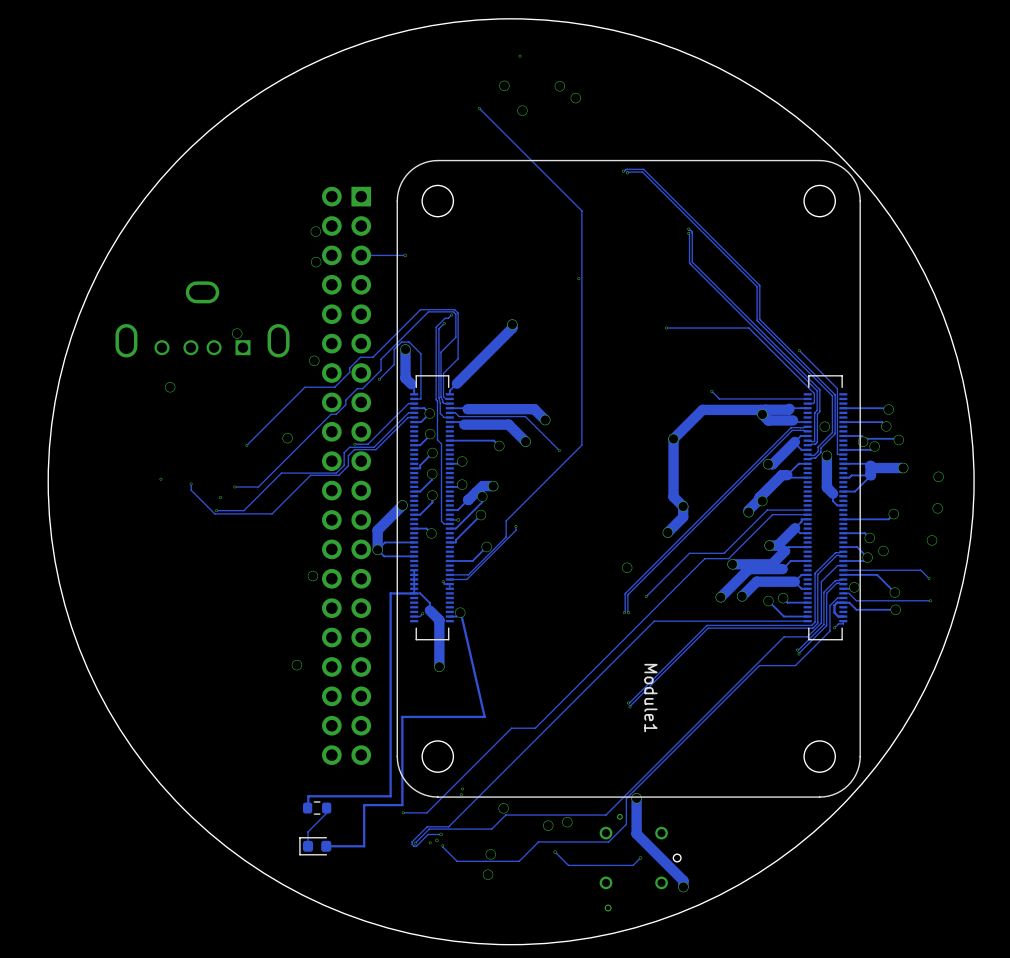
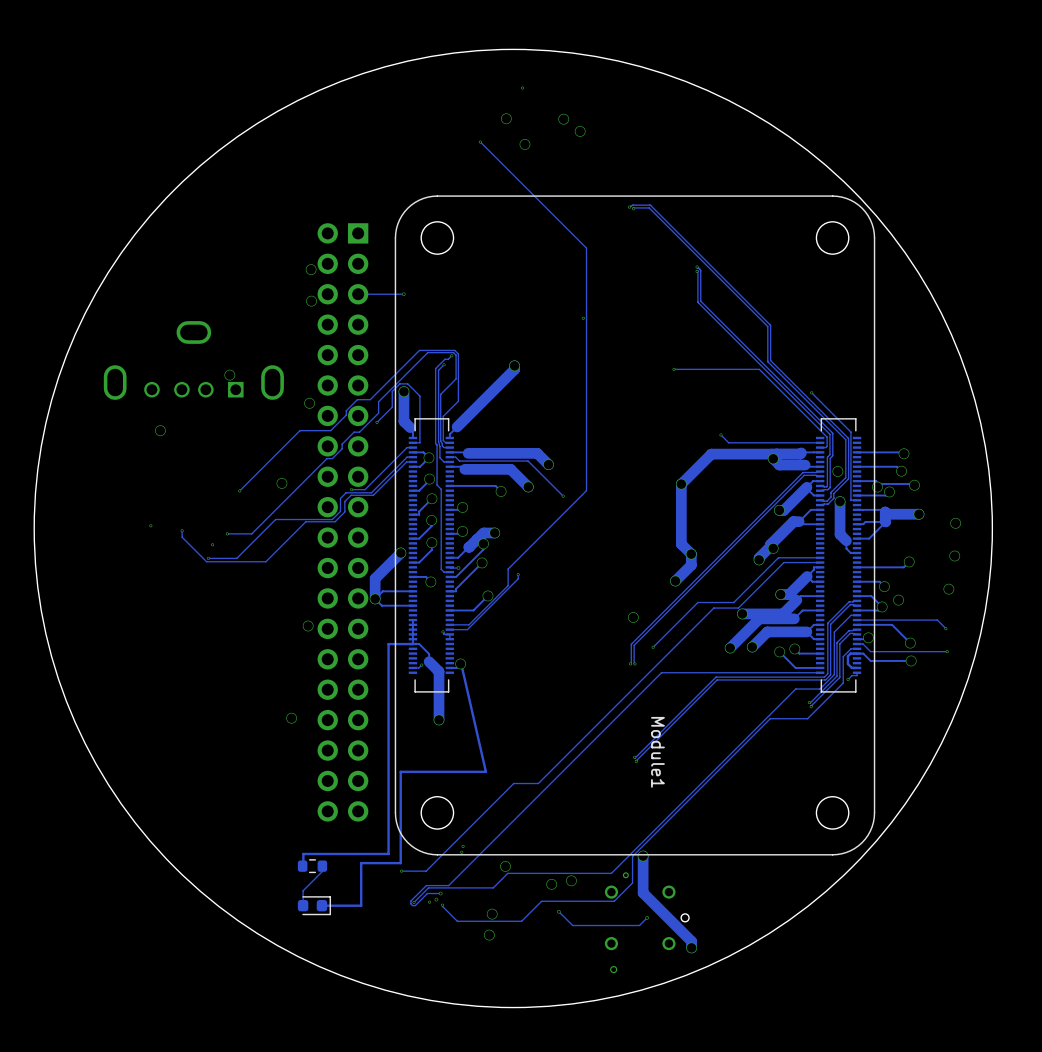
part rotation: 0° (315, 846) -> 180° (314, 905)

